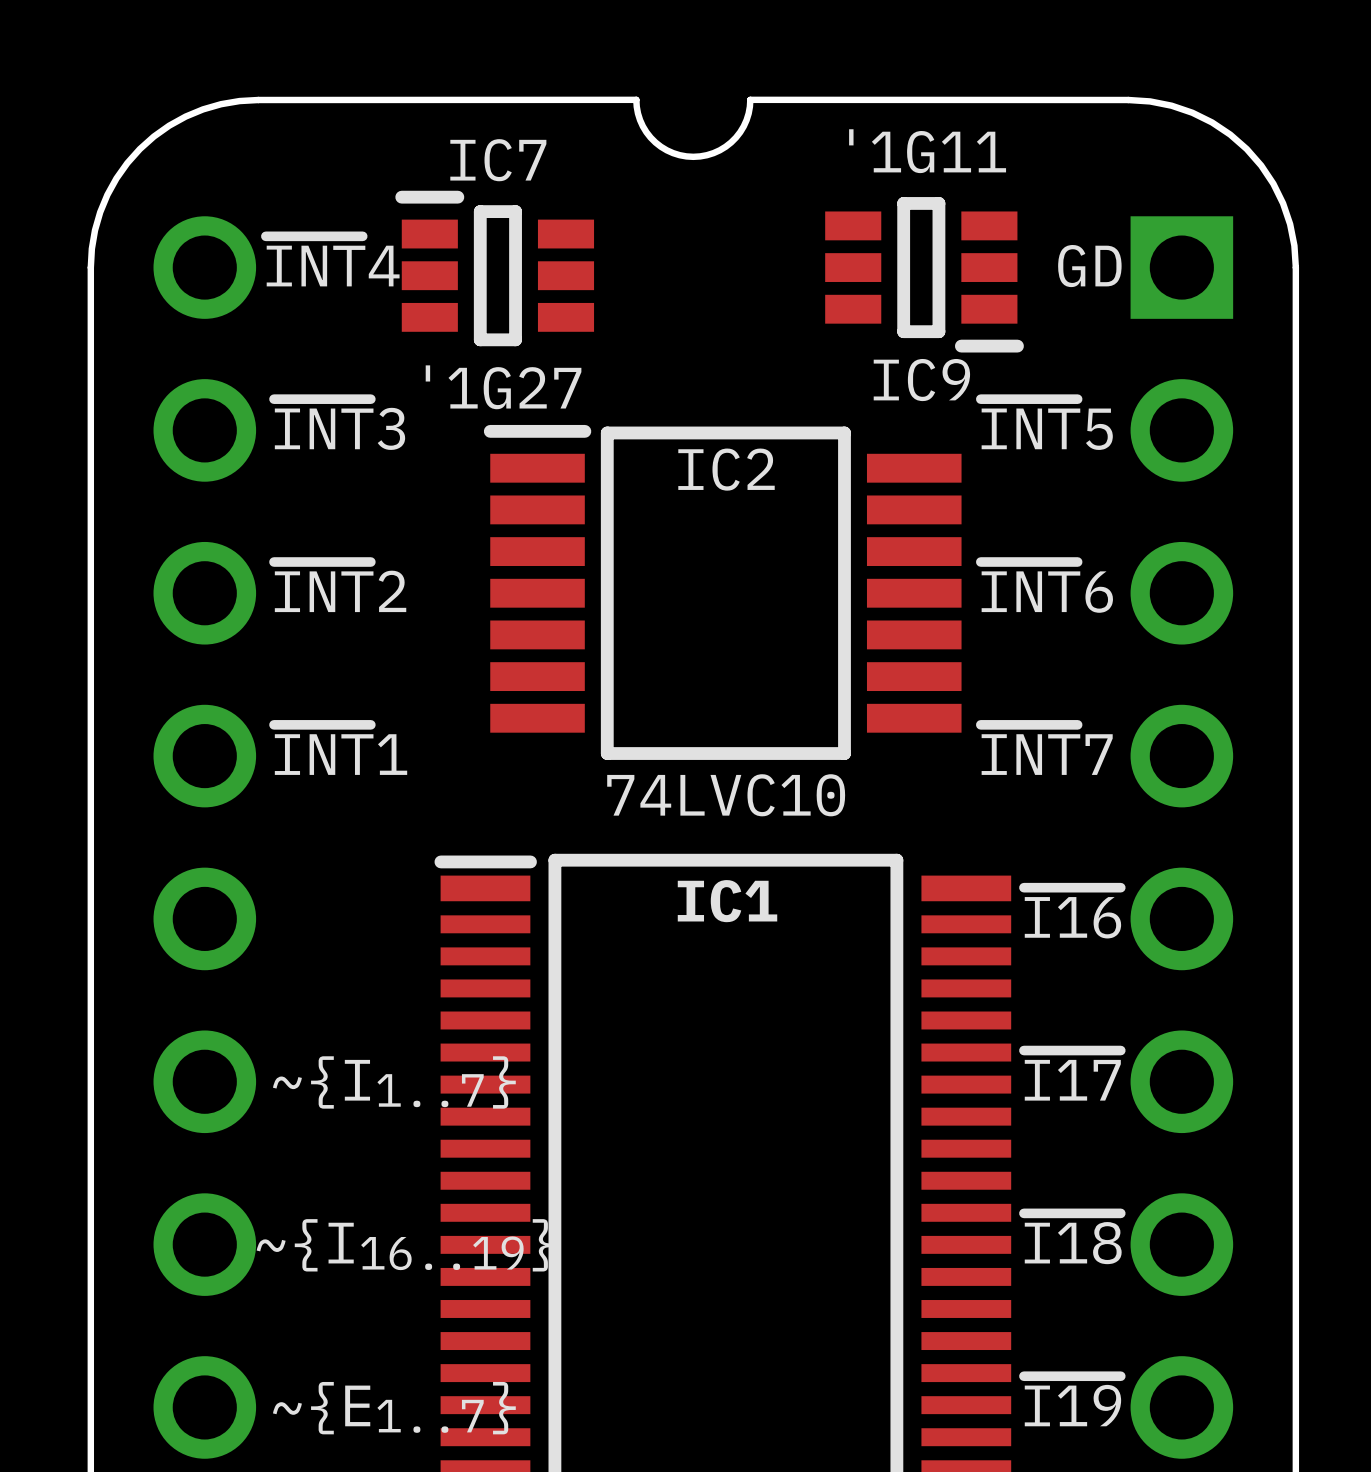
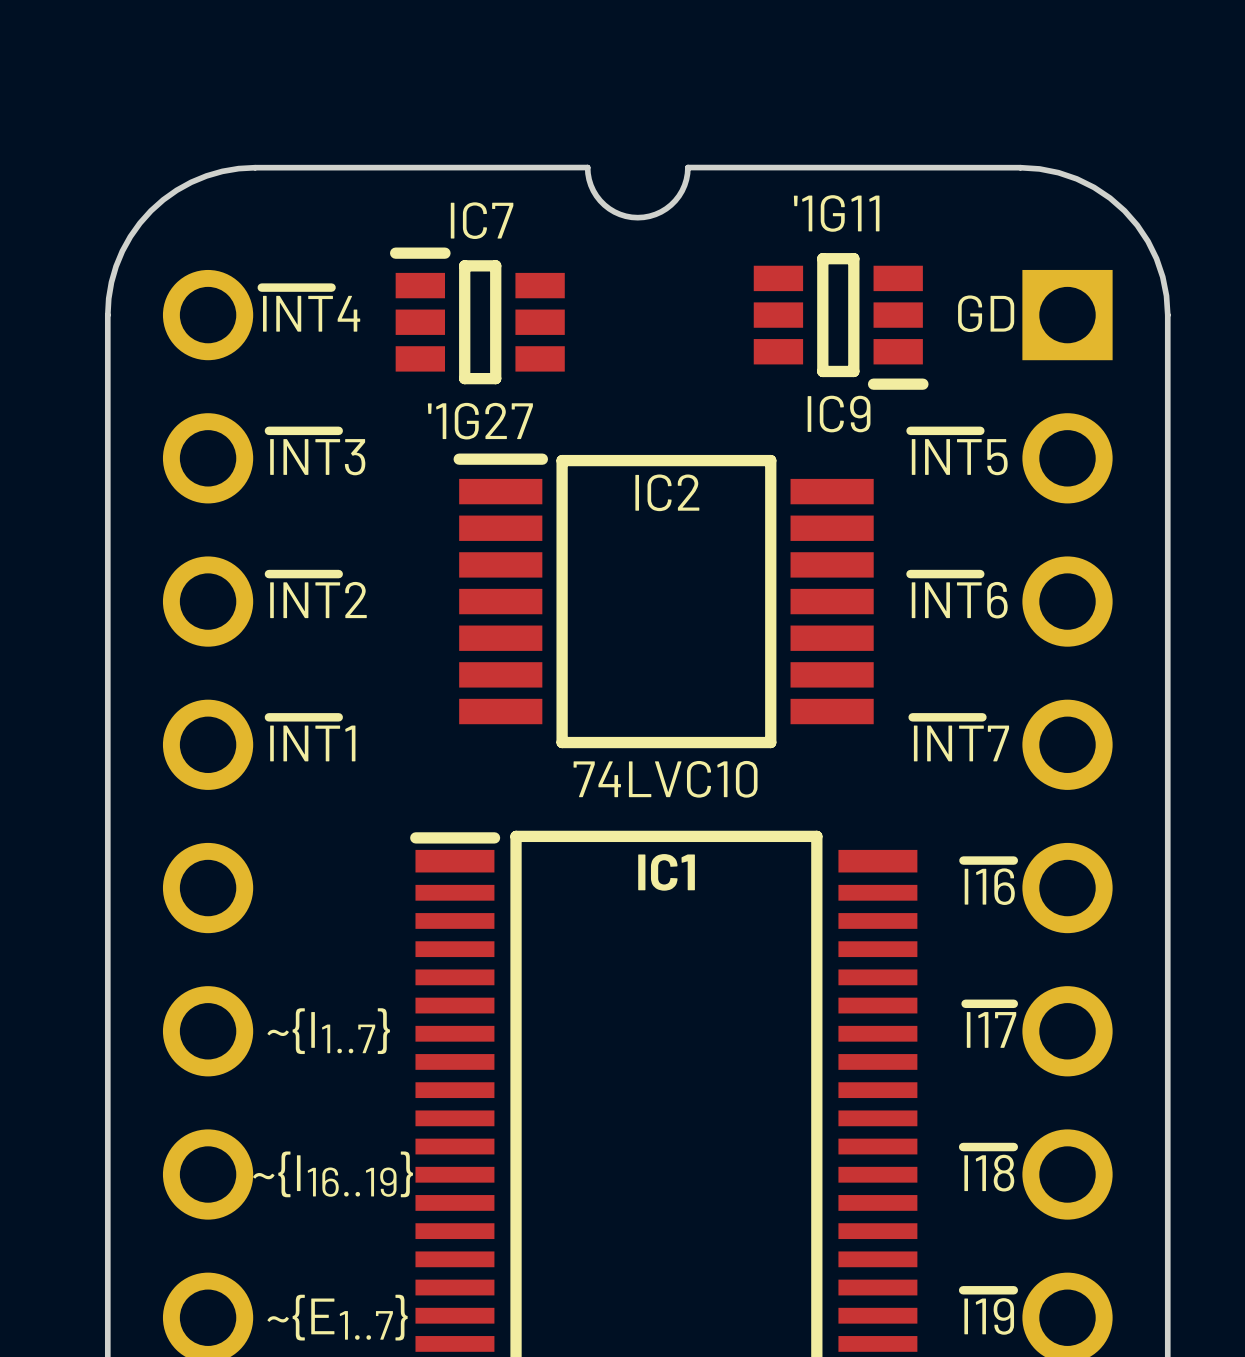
IC7 position: (494, 268) -> (477, 315)

